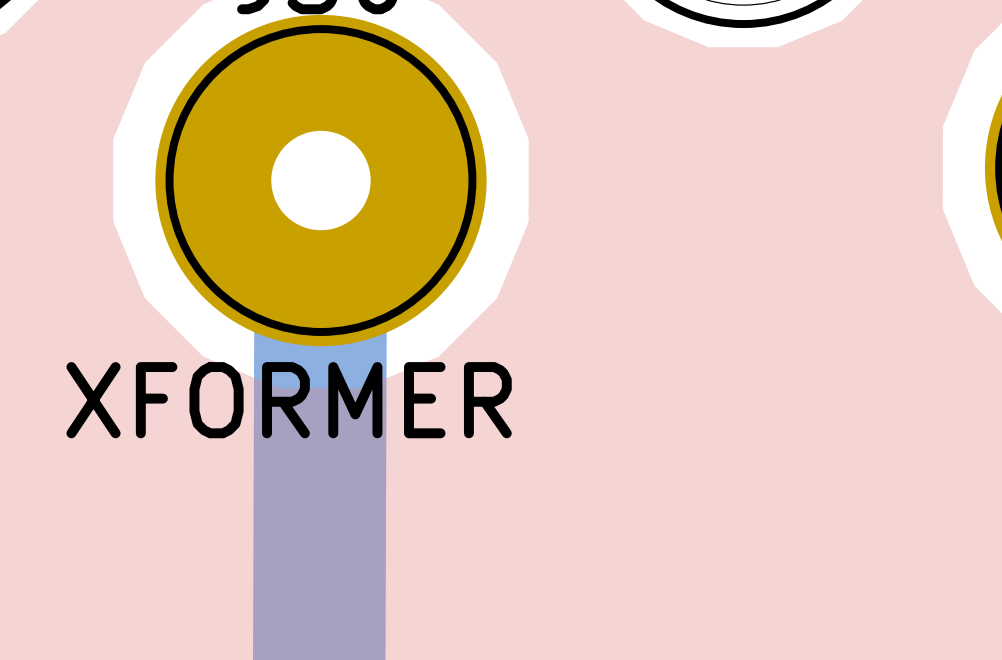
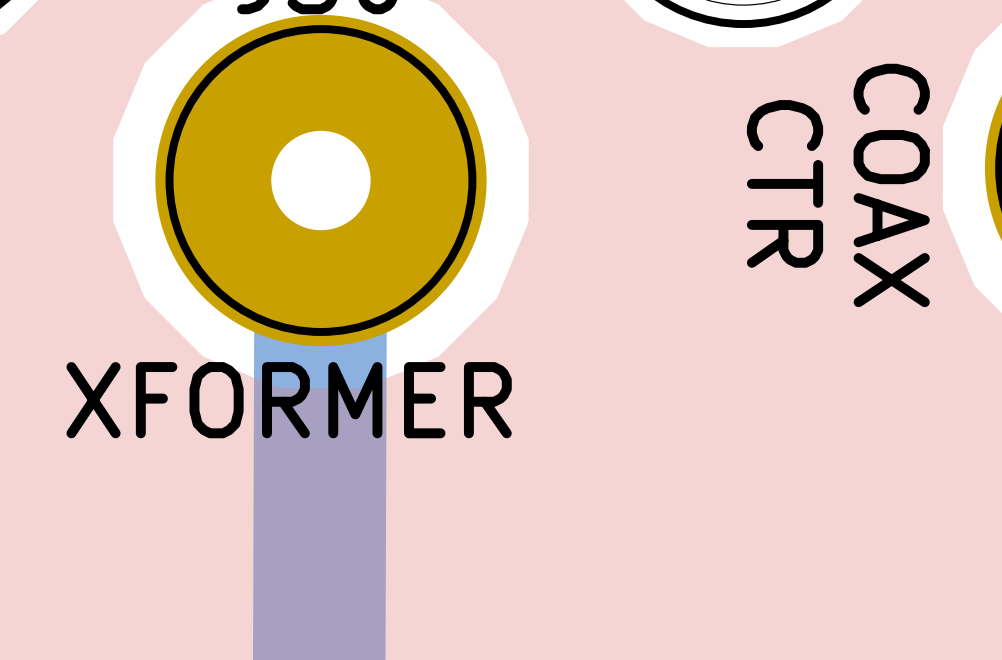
text: none -> CTR (785, 183)
text: none -> COAX (891, 185)

